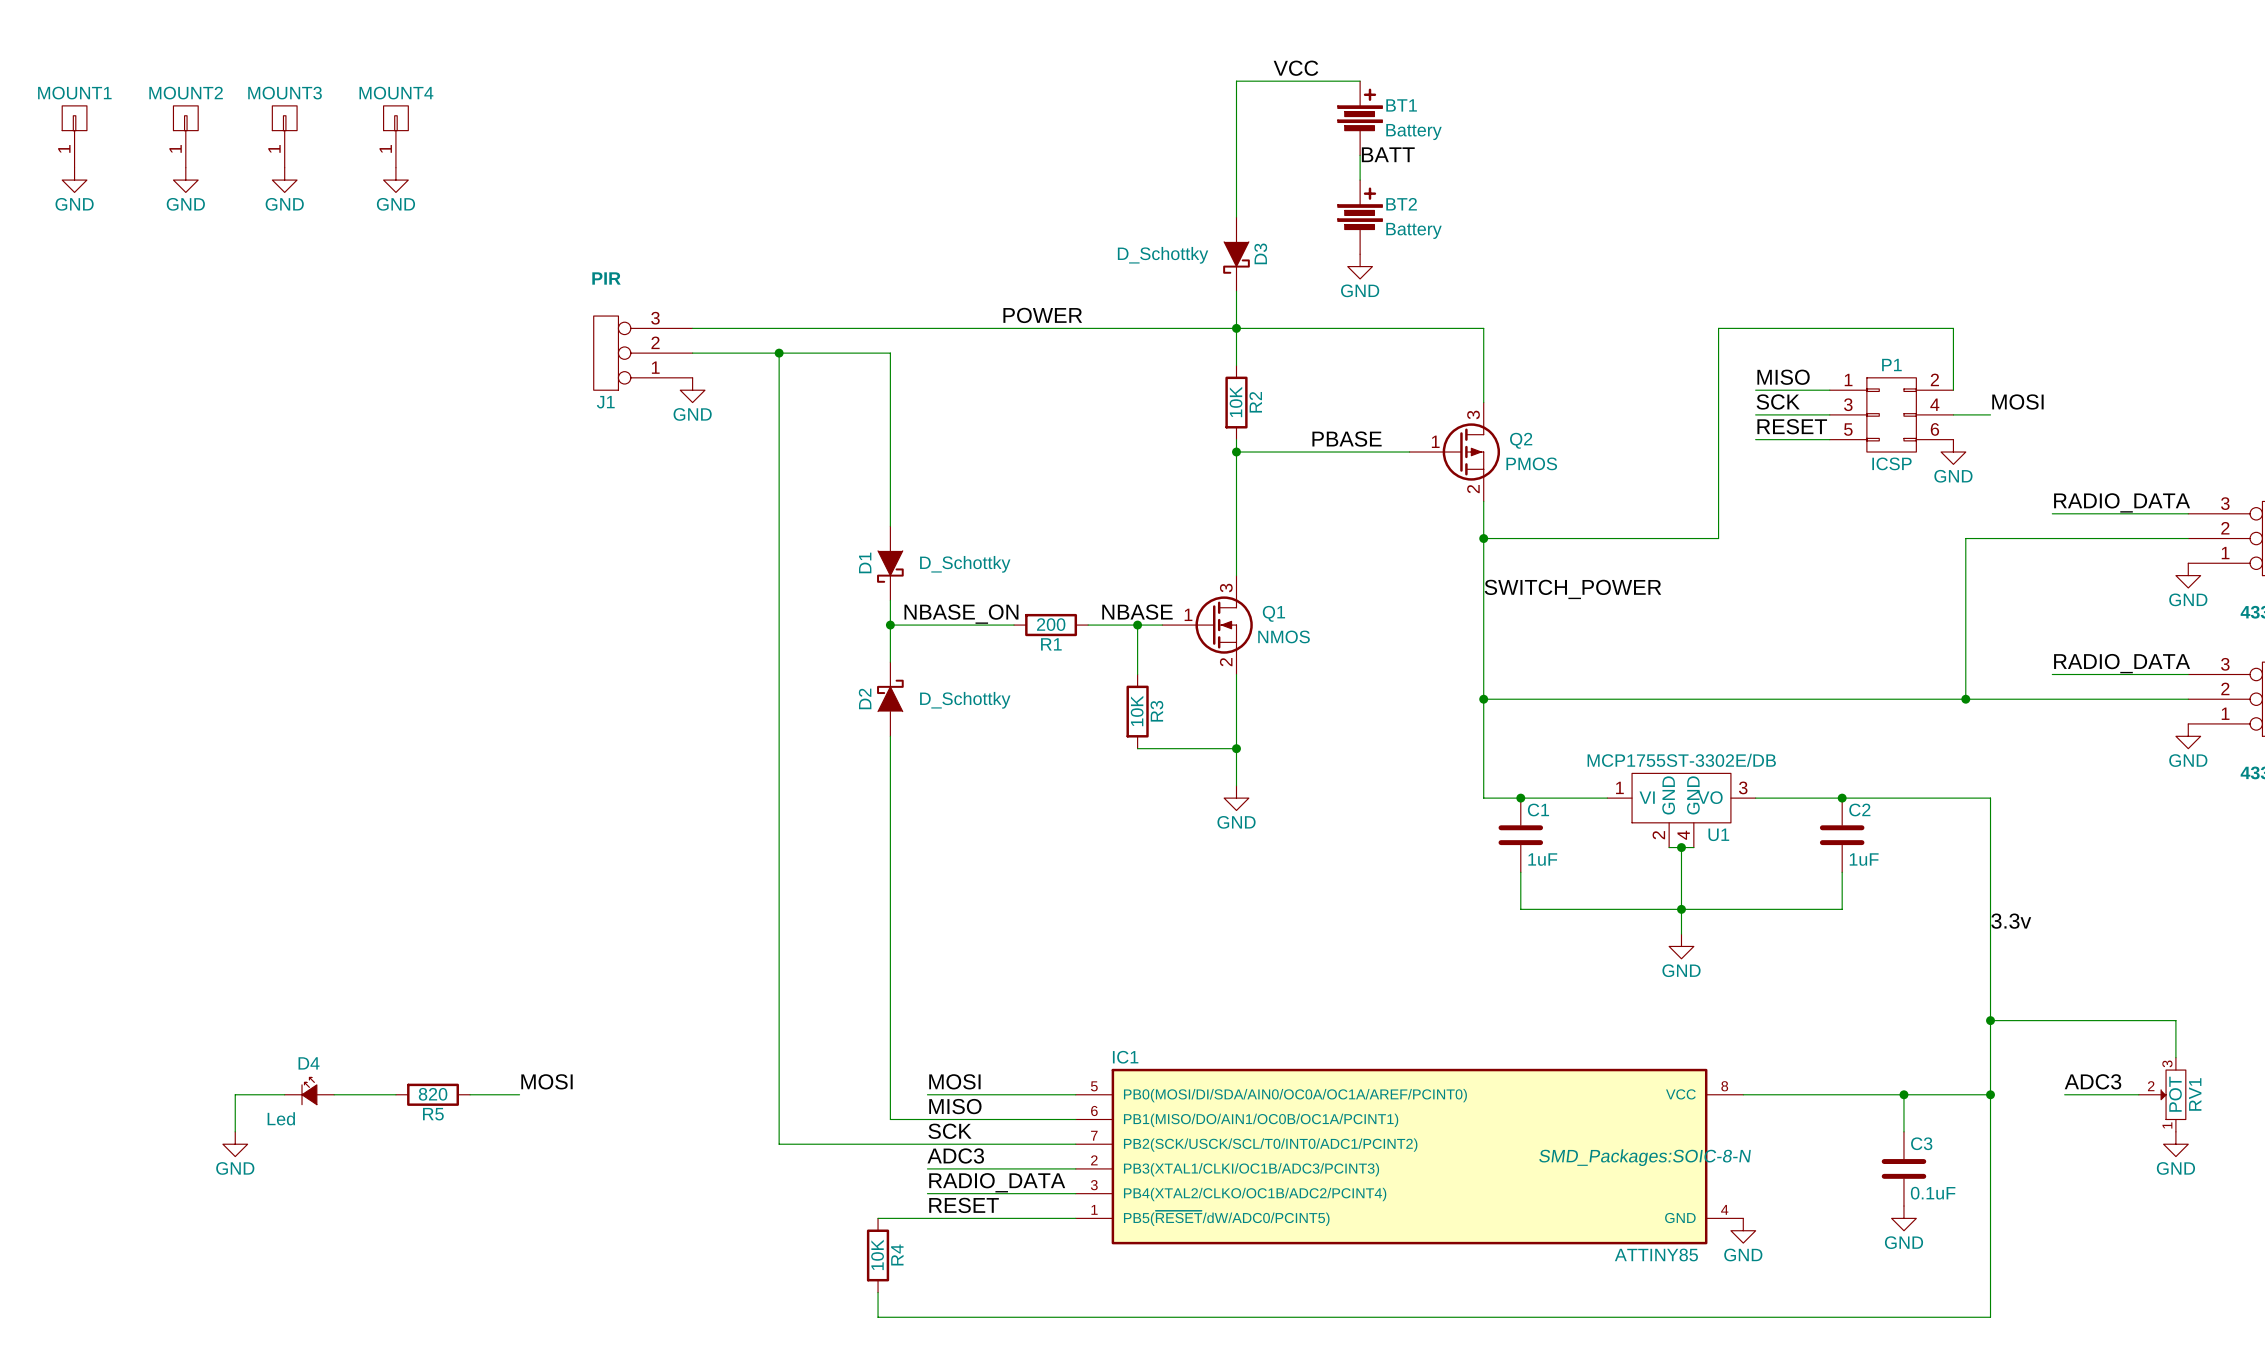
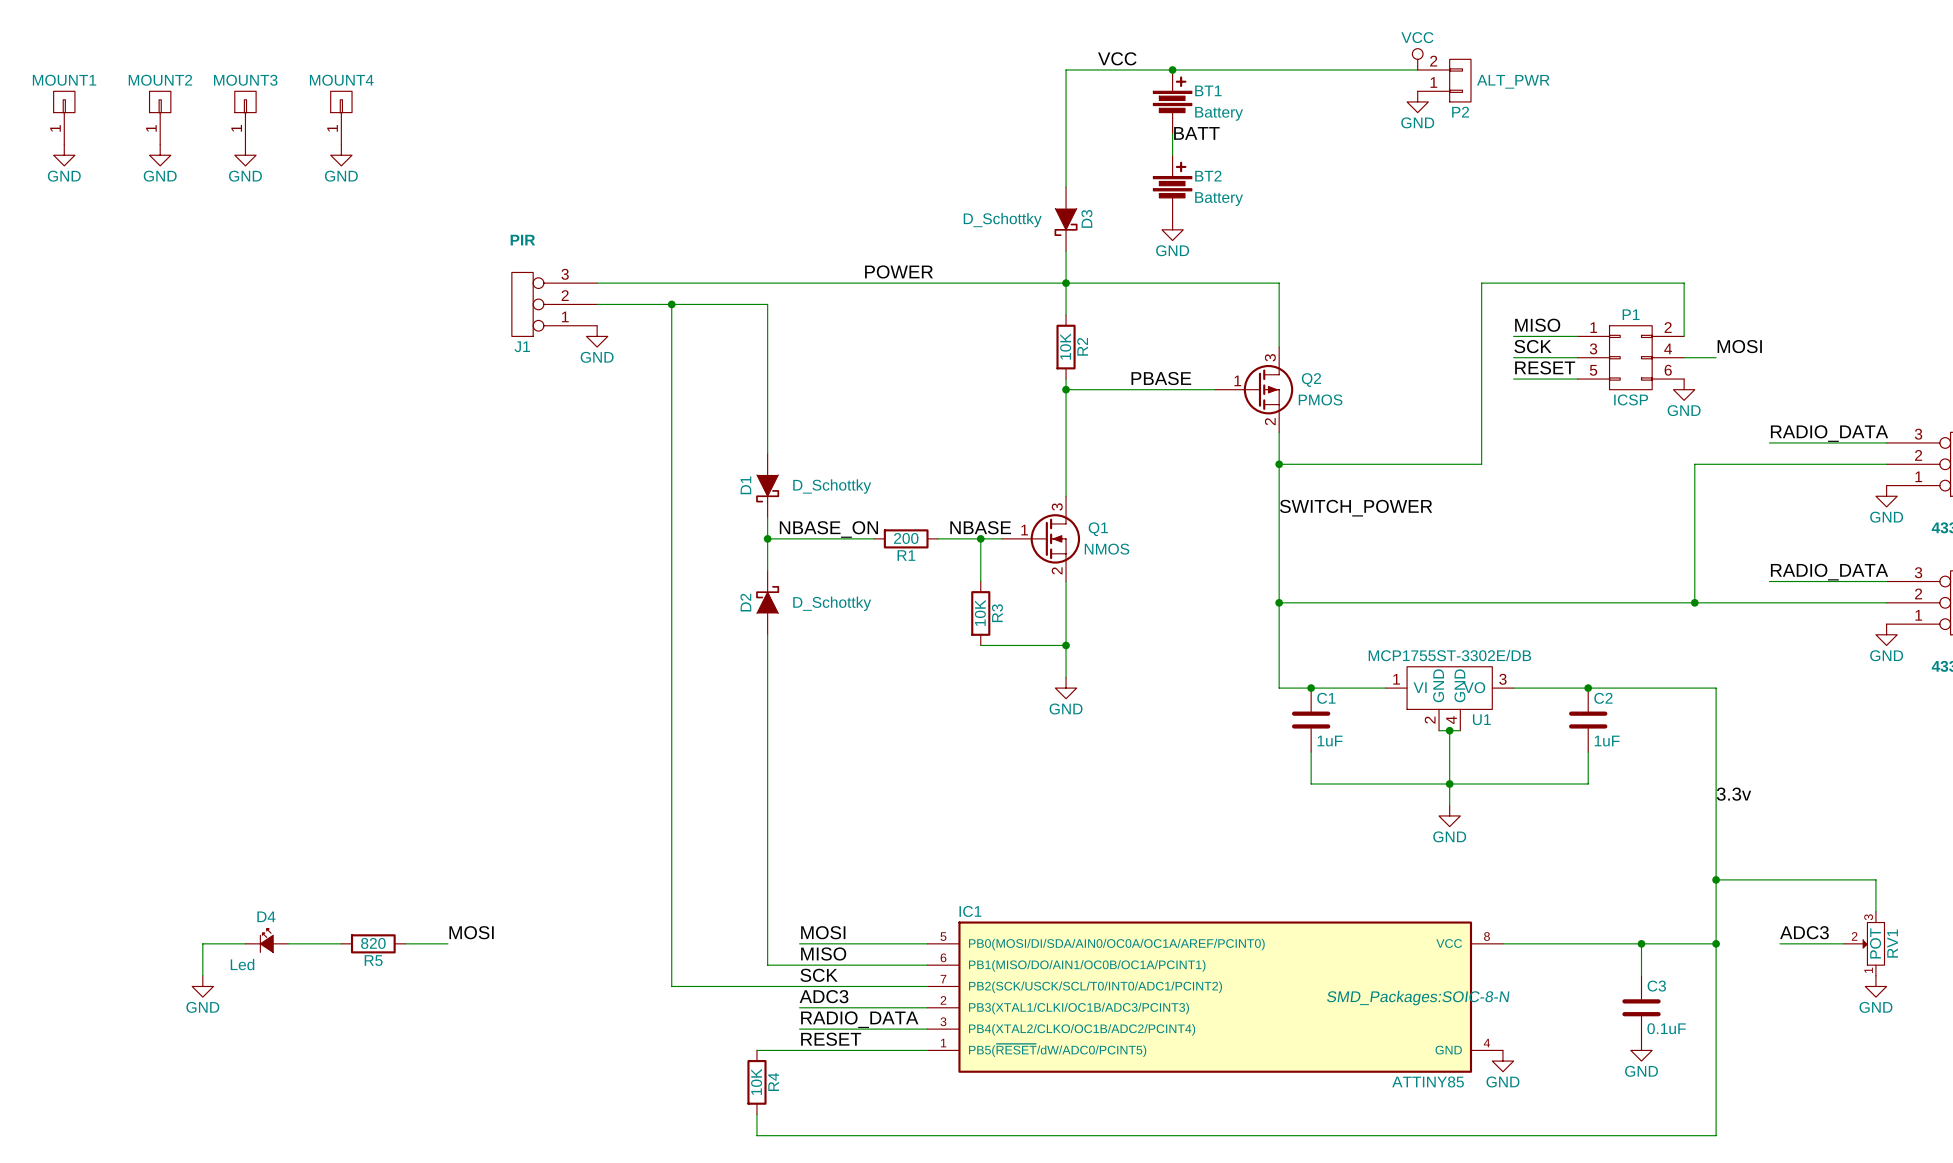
power symbol: none -> VCC (1417, 59)
wire: none -> (1172, 69) (1417, 69)
junction: none -> (1172, 69)
P2: none -> ALT_PWR (1444, 80)
power symbol: none -> GND (1417, 101)

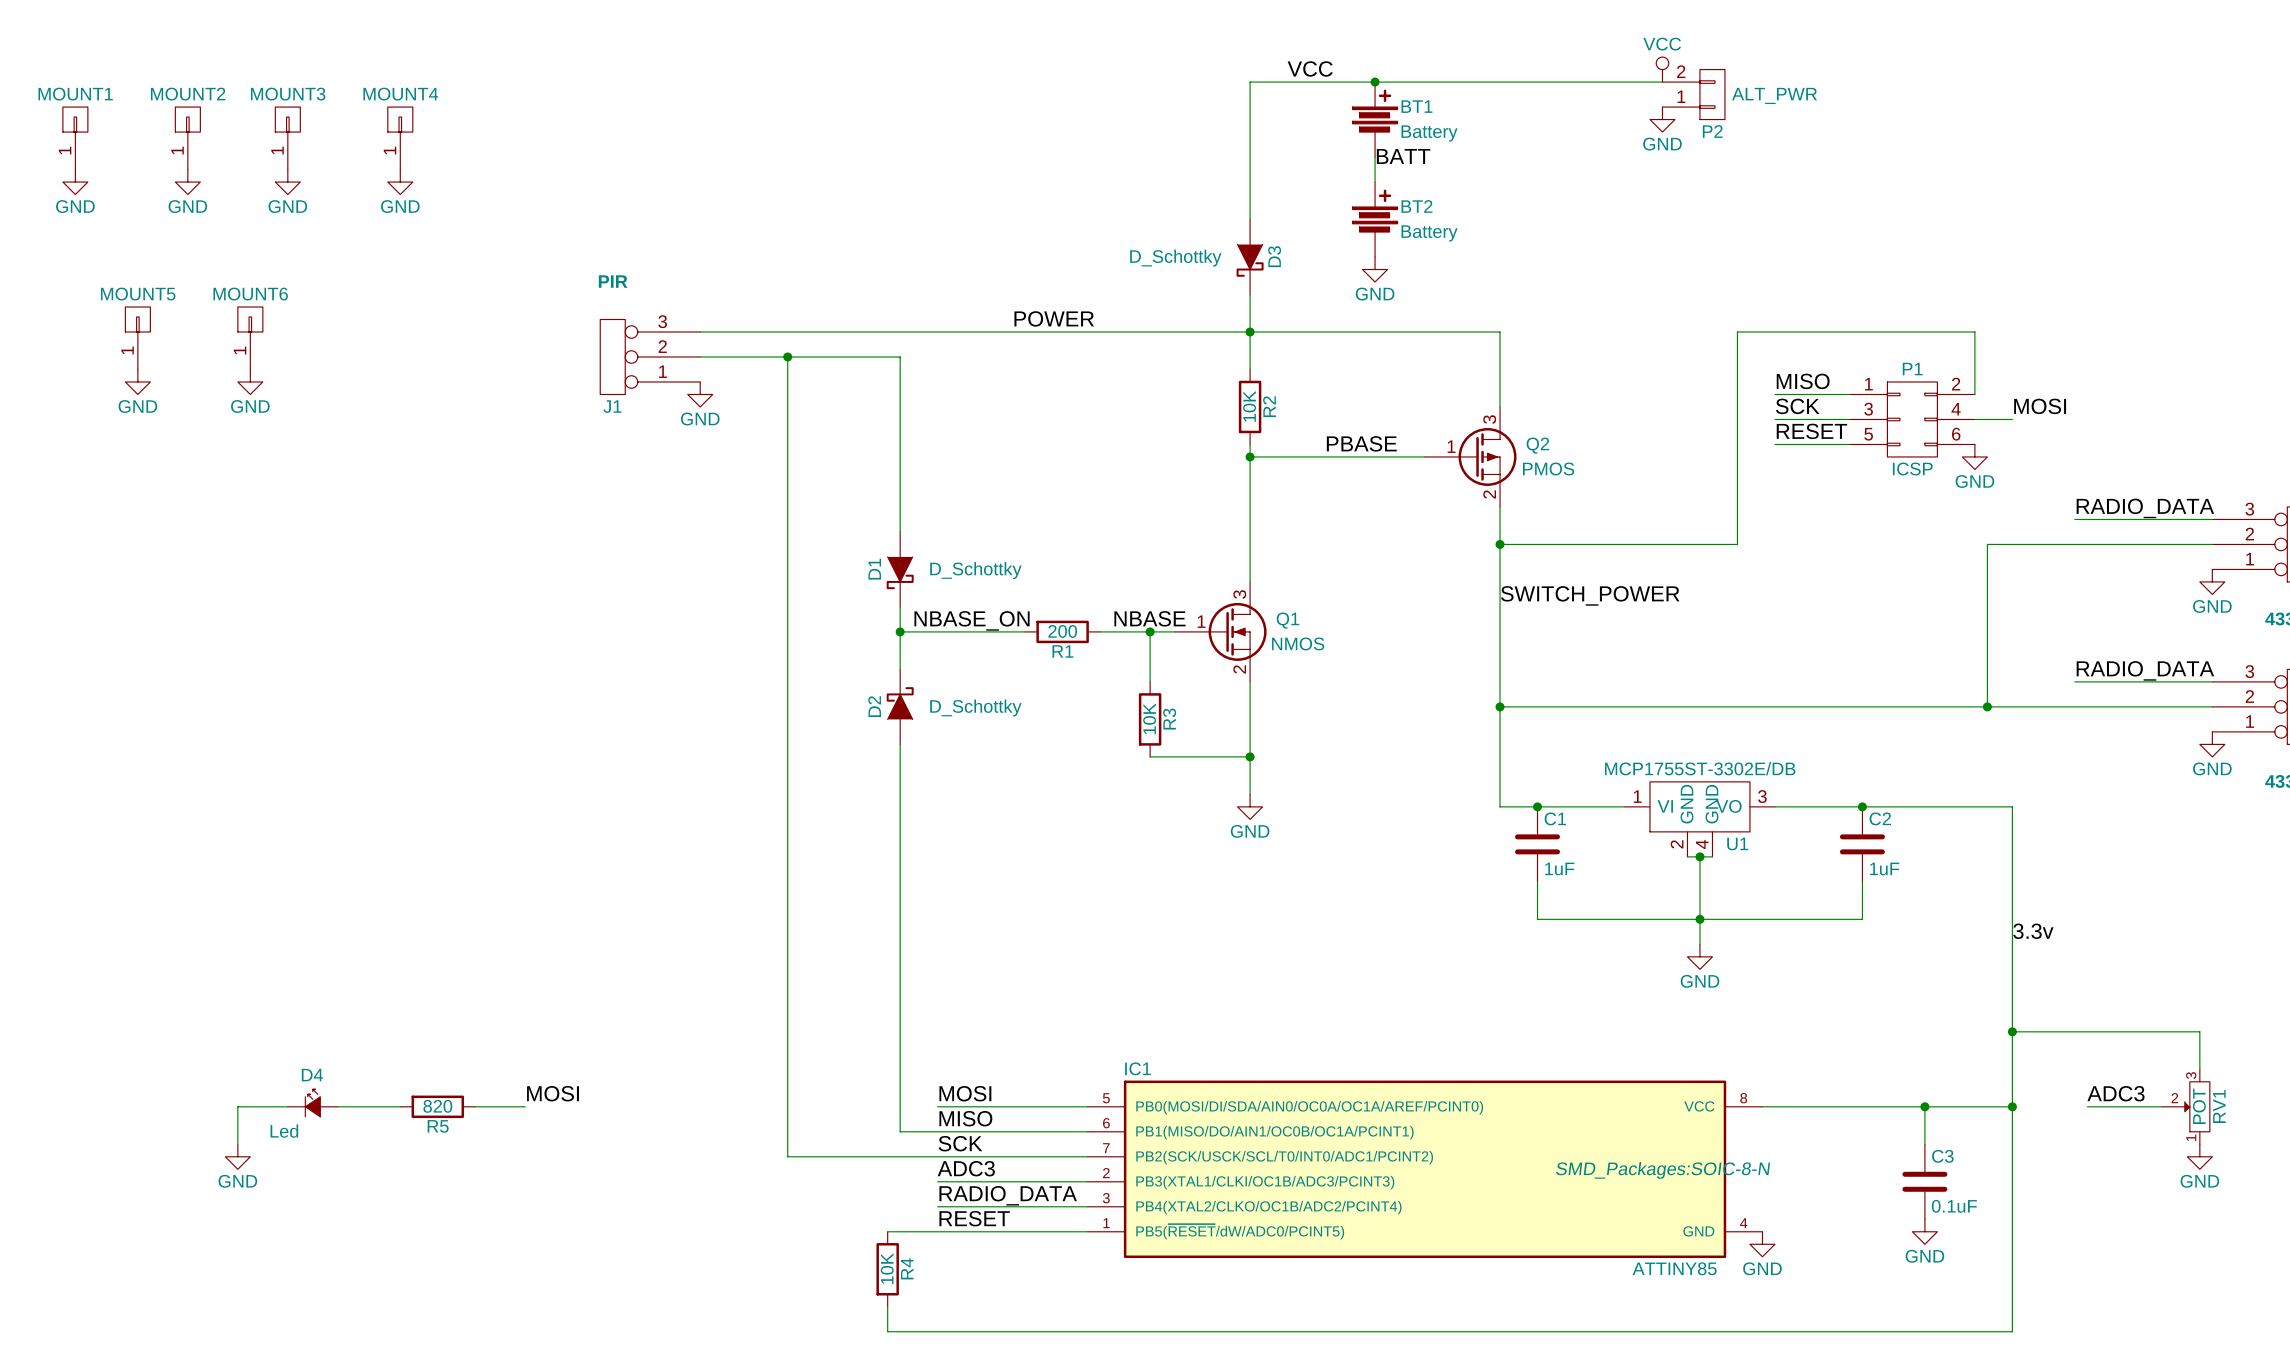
MOUNT5: none -> (137, 338)
MOUNT6: none -> (250, 338)
power symbol: none -> GND (137, 381)
power symbol: none -> GND (250, 381)

